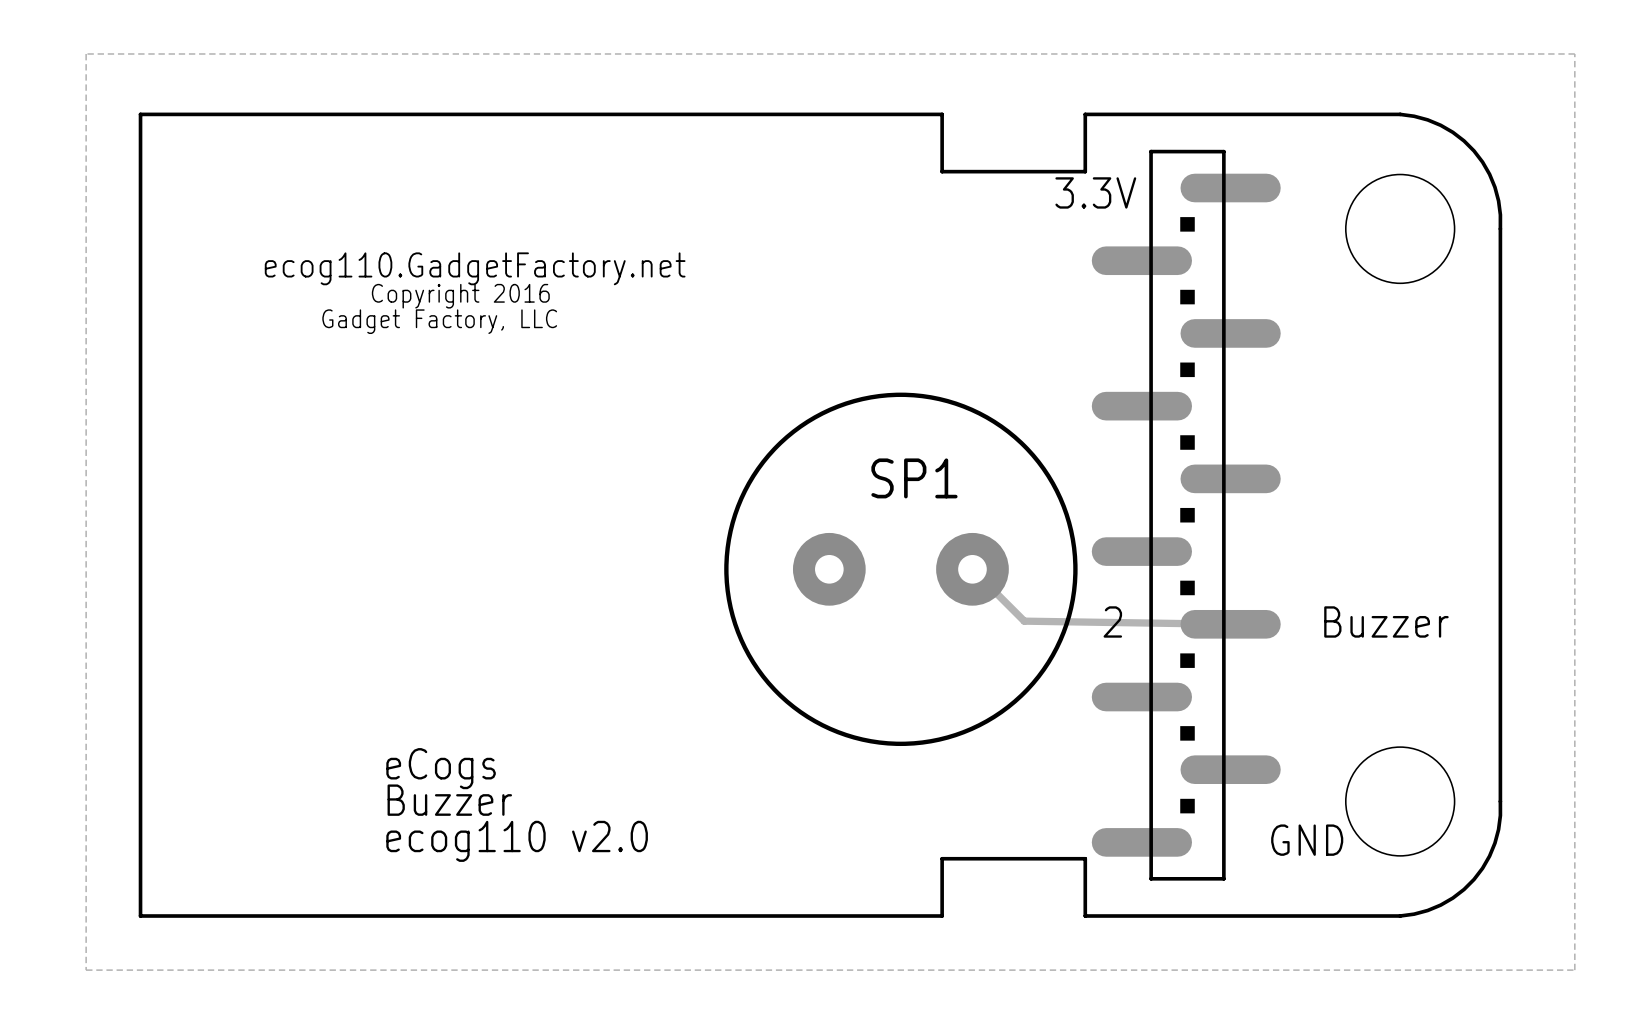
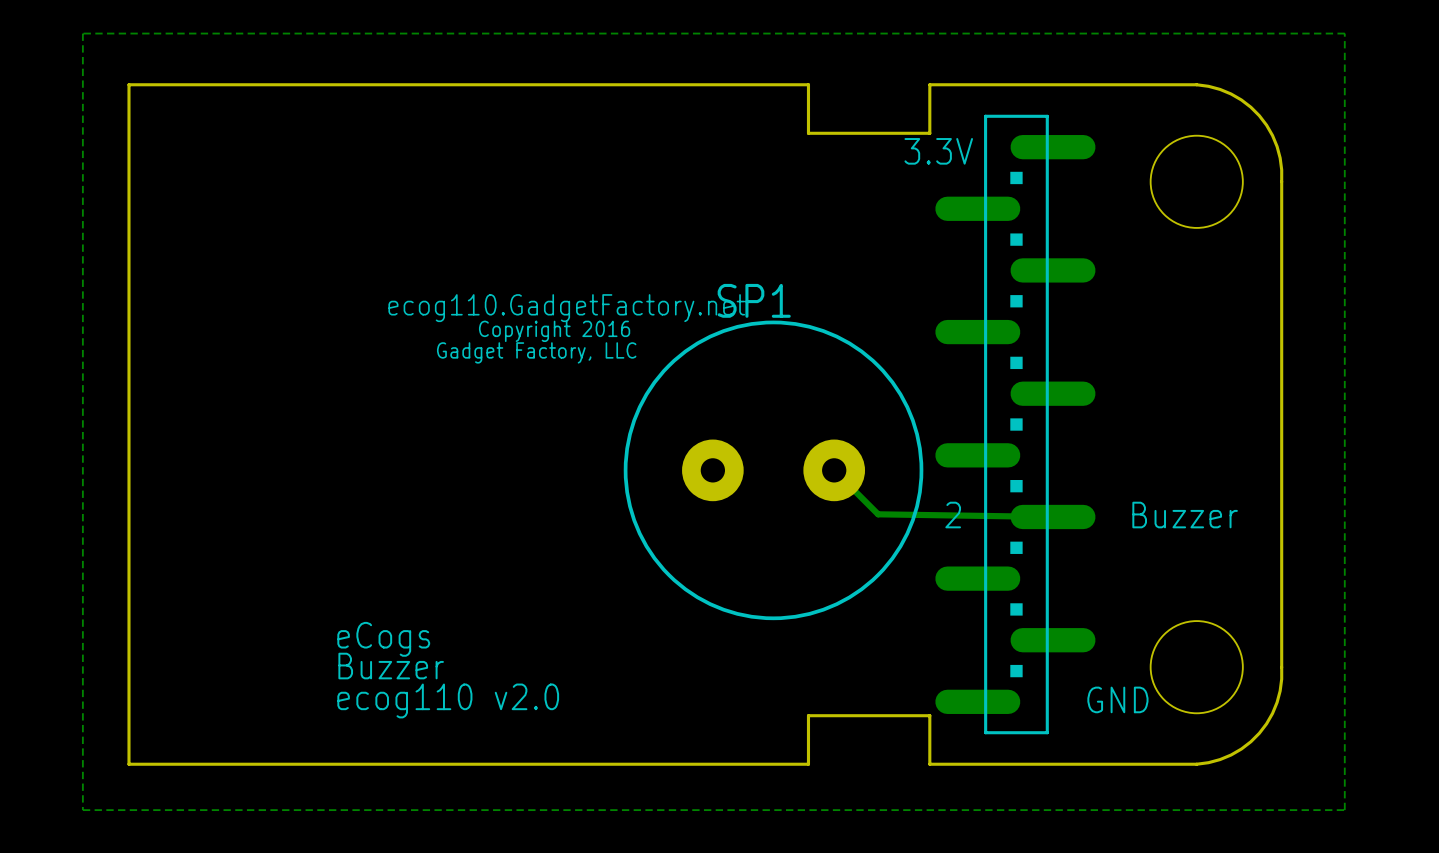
text position: ecog110.GadgetFactory.net (475, 268) -> ecog110.GadgetFactory.net (566, 308)
text position: Copyright 2016 (460, 296) -> Copyright 2016 (554, 331)
text position: Gadget Factory, LLC (439, 321) -> Gadget Factory, LLC (536, 352)
SP1 name position: SP1 (914, 478) -> SP1 (754, 300)

